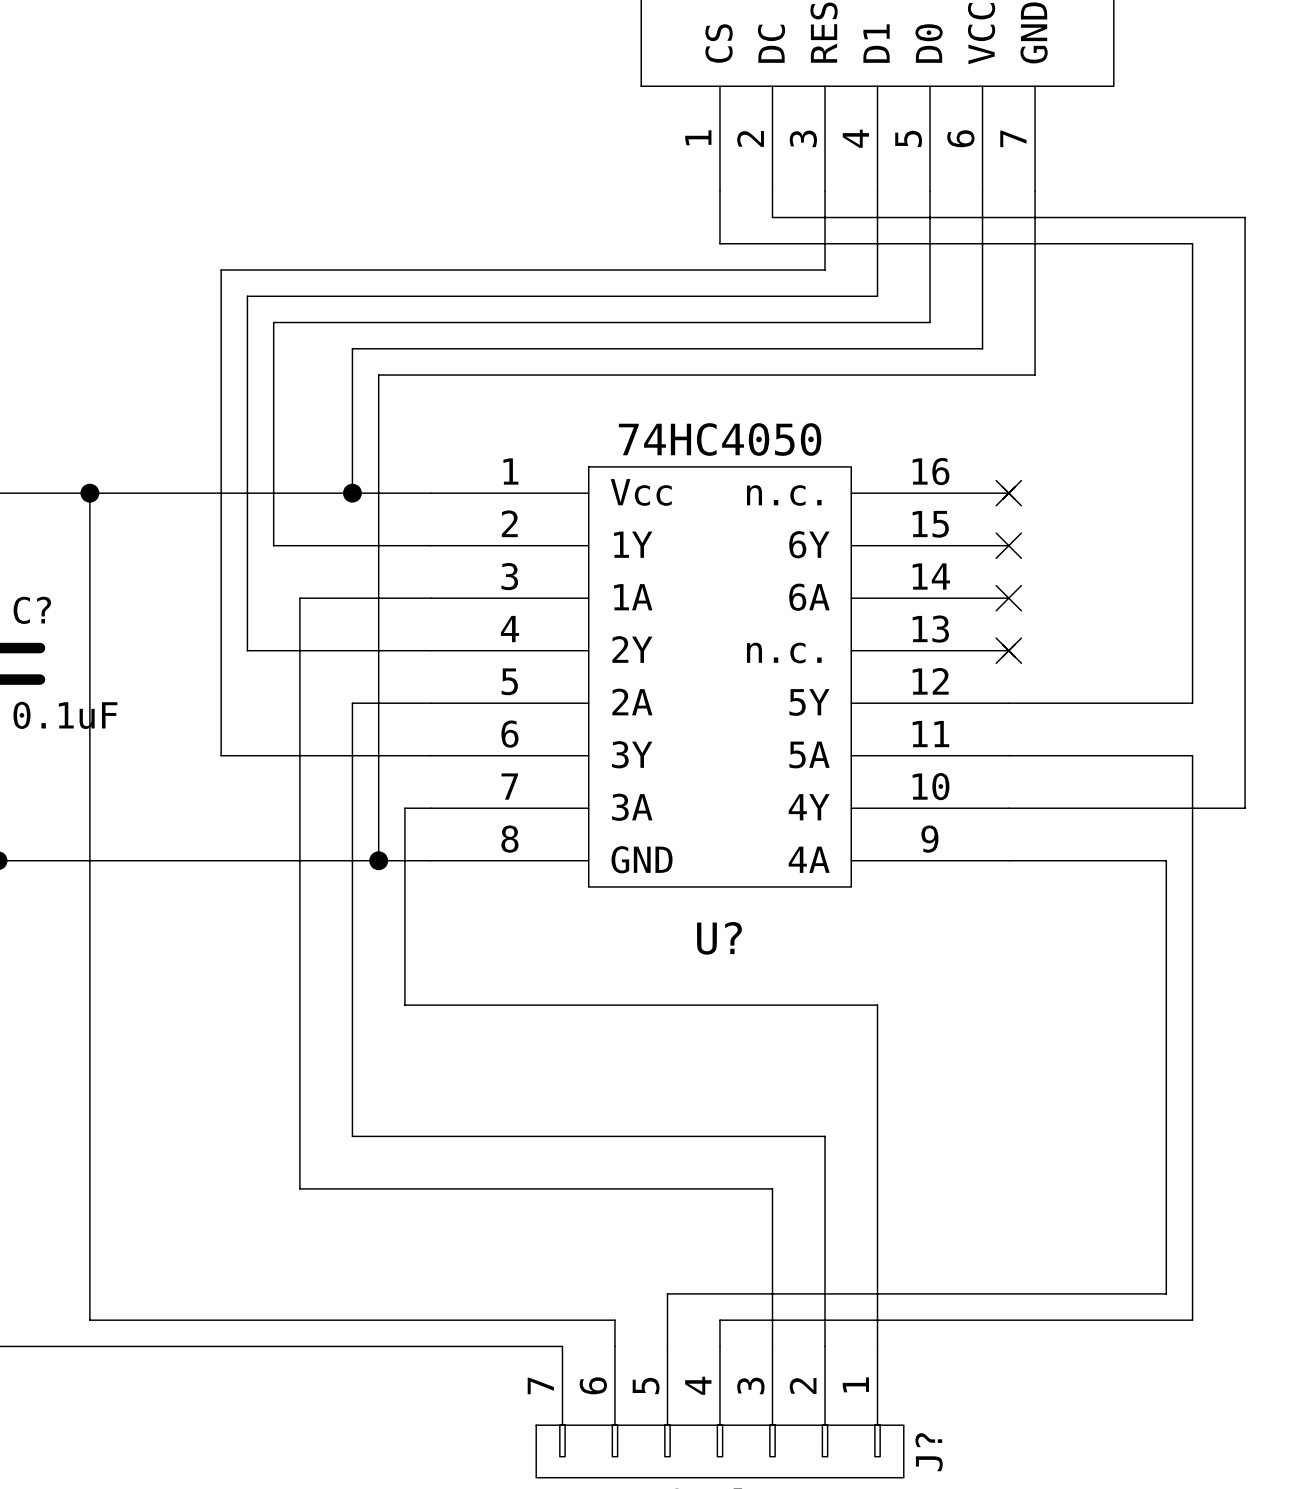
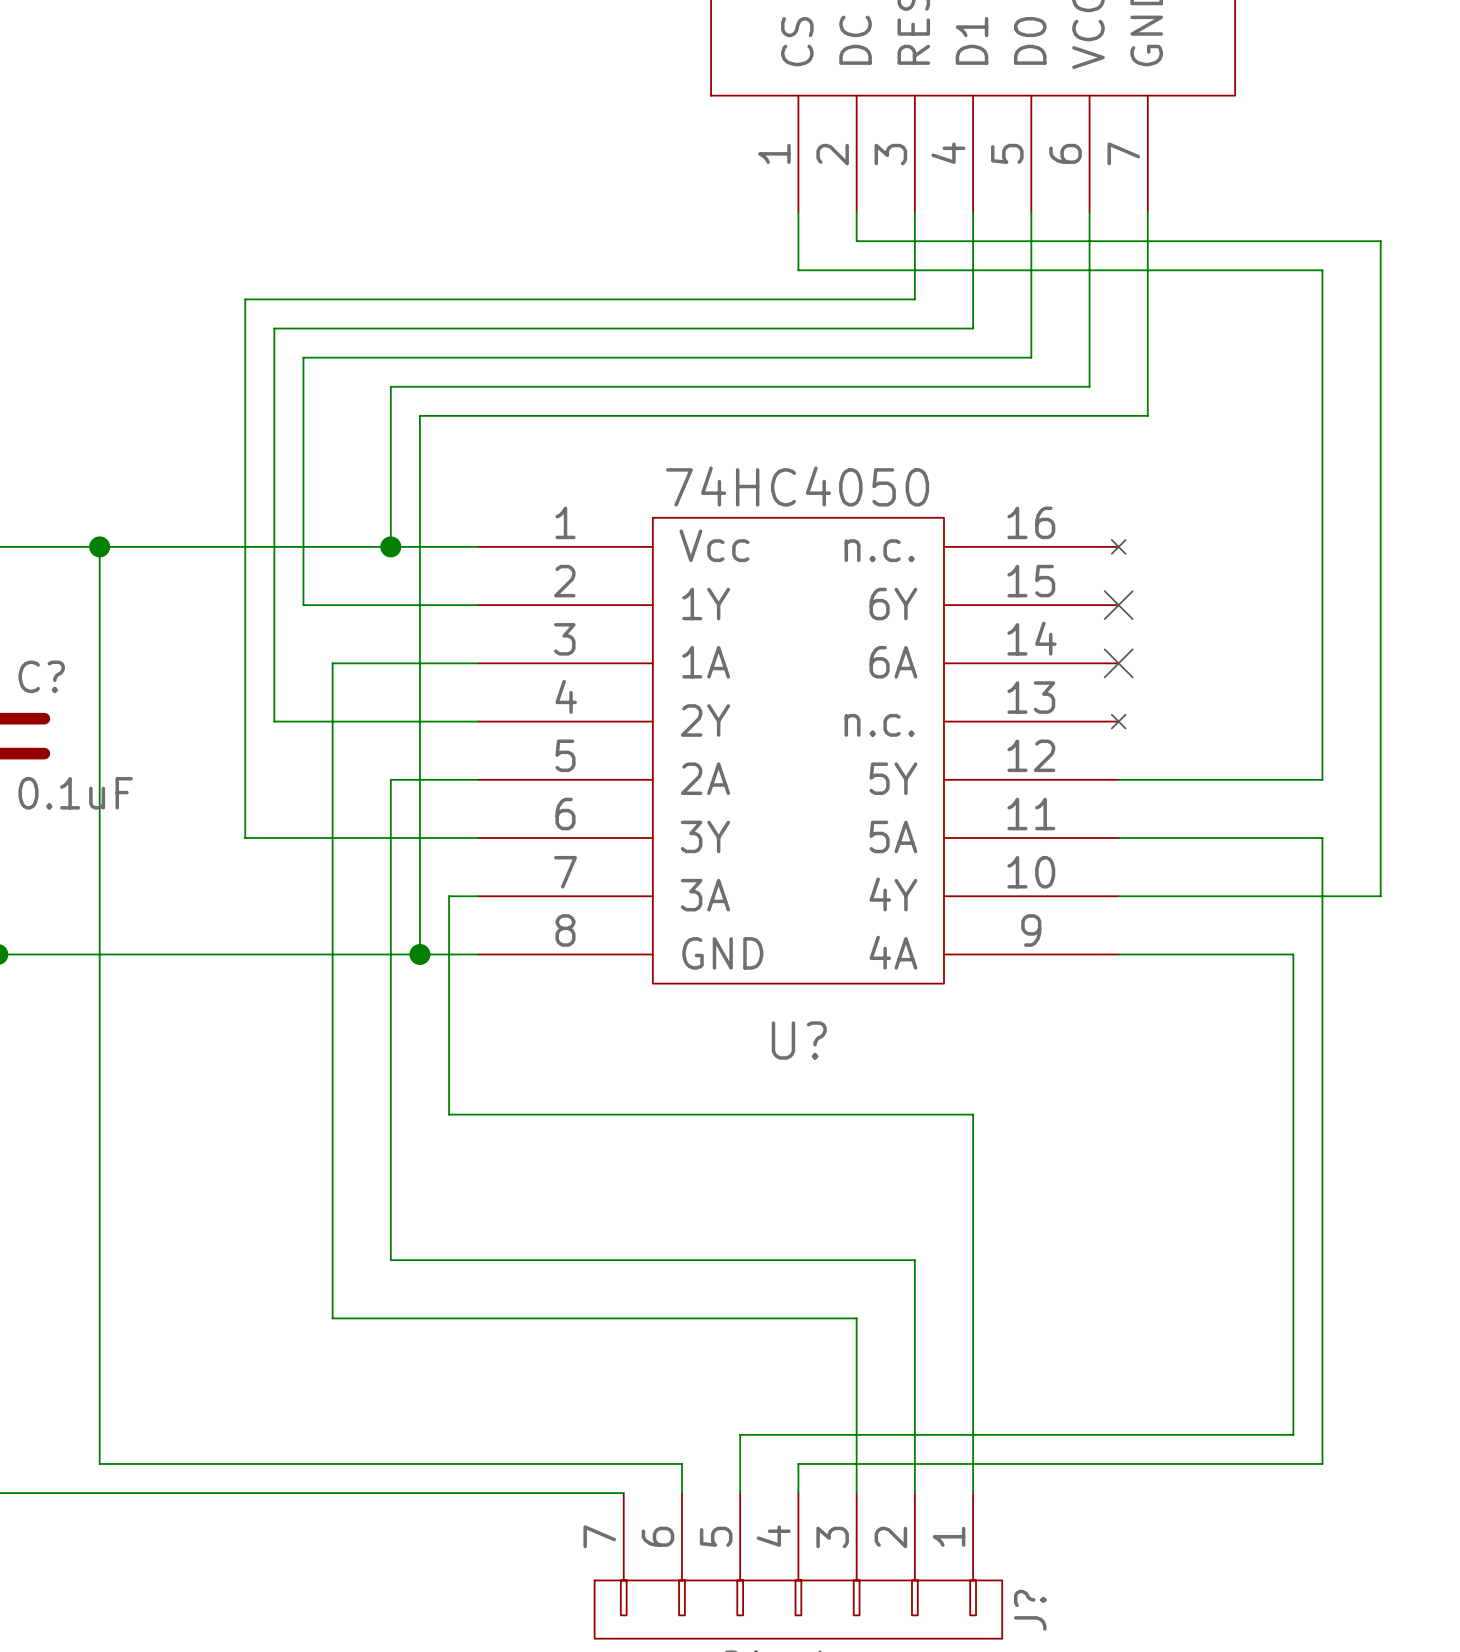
no-connect mark: (1008, 493) -> none
no-connect mark: (1008, 650) -> none

